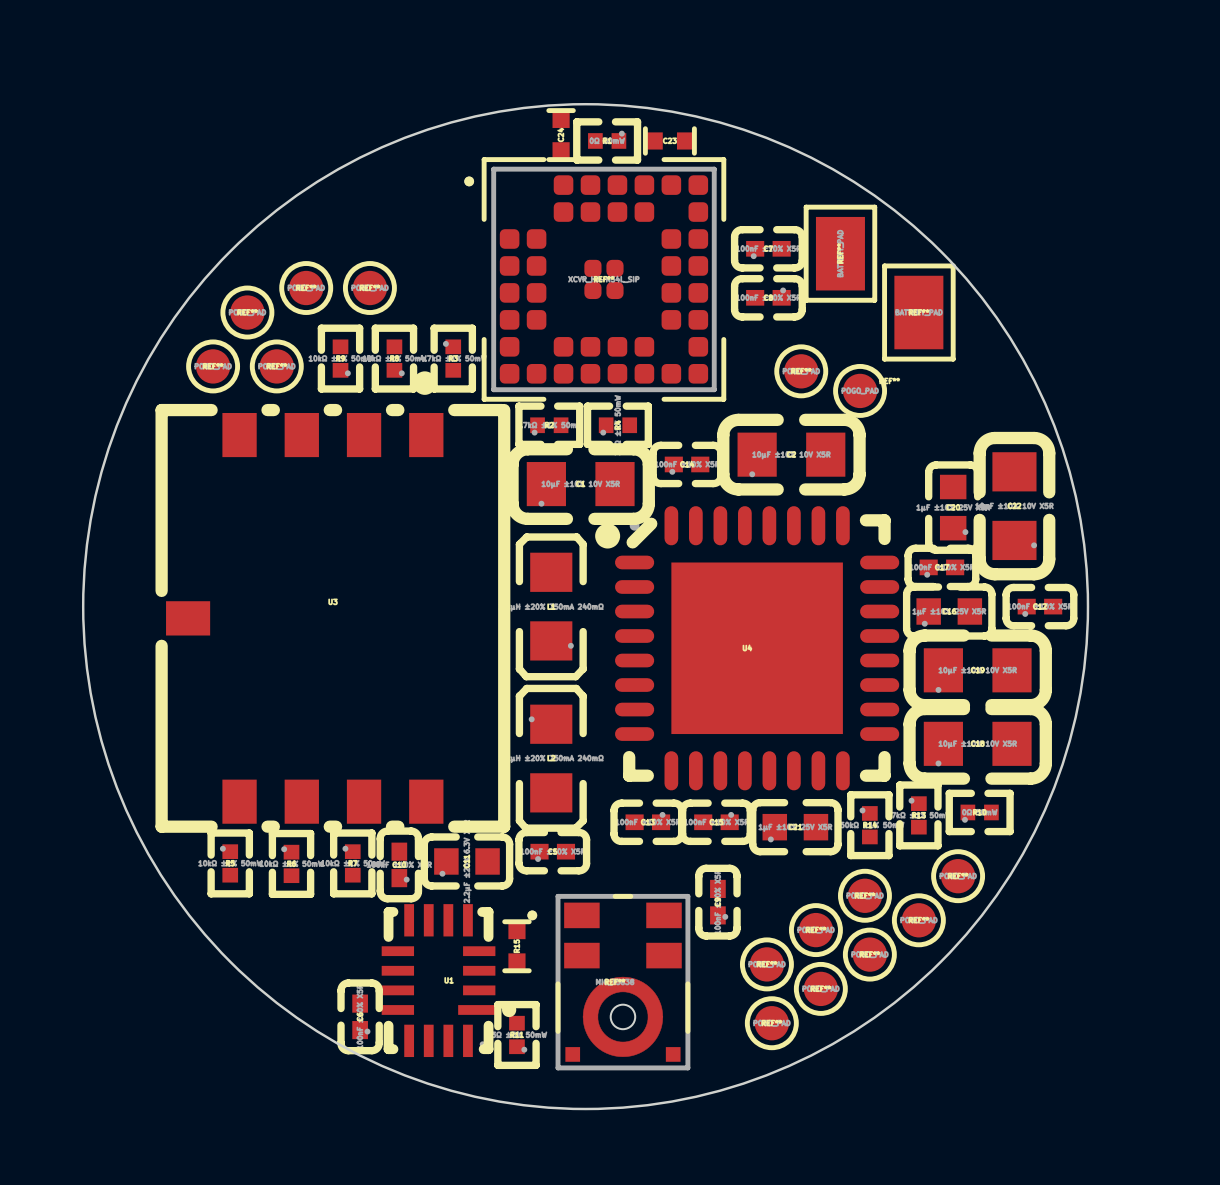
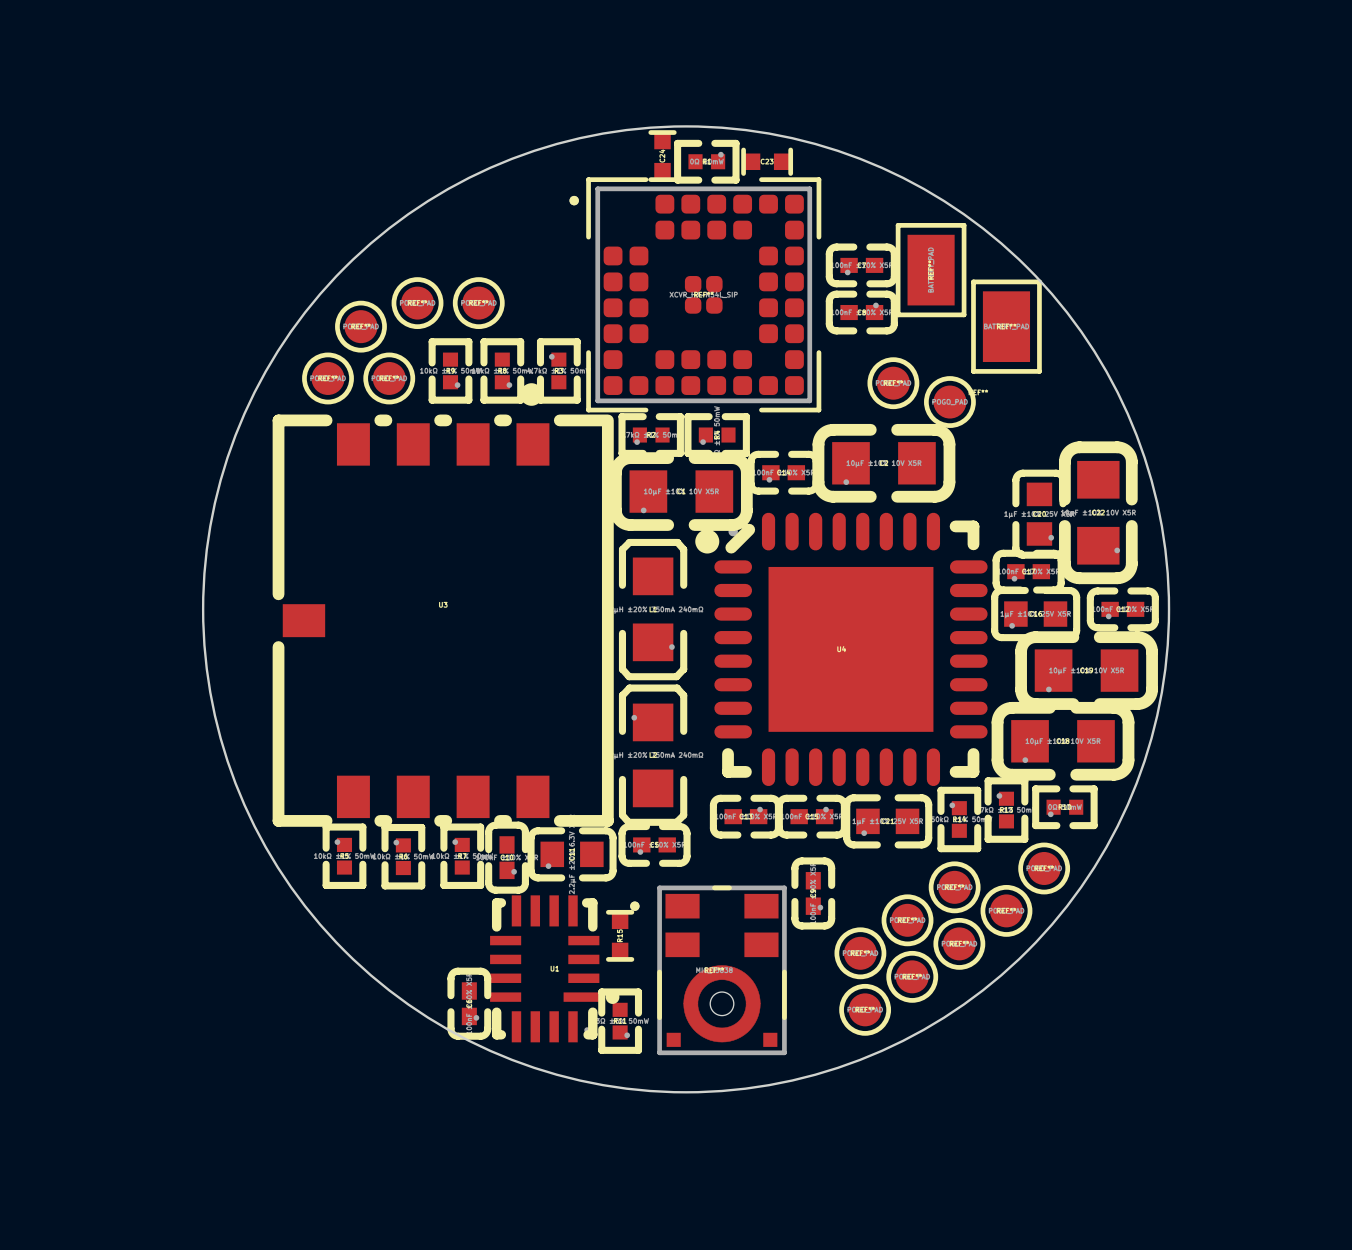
part position: (977, 670) -> (1086, 670)

